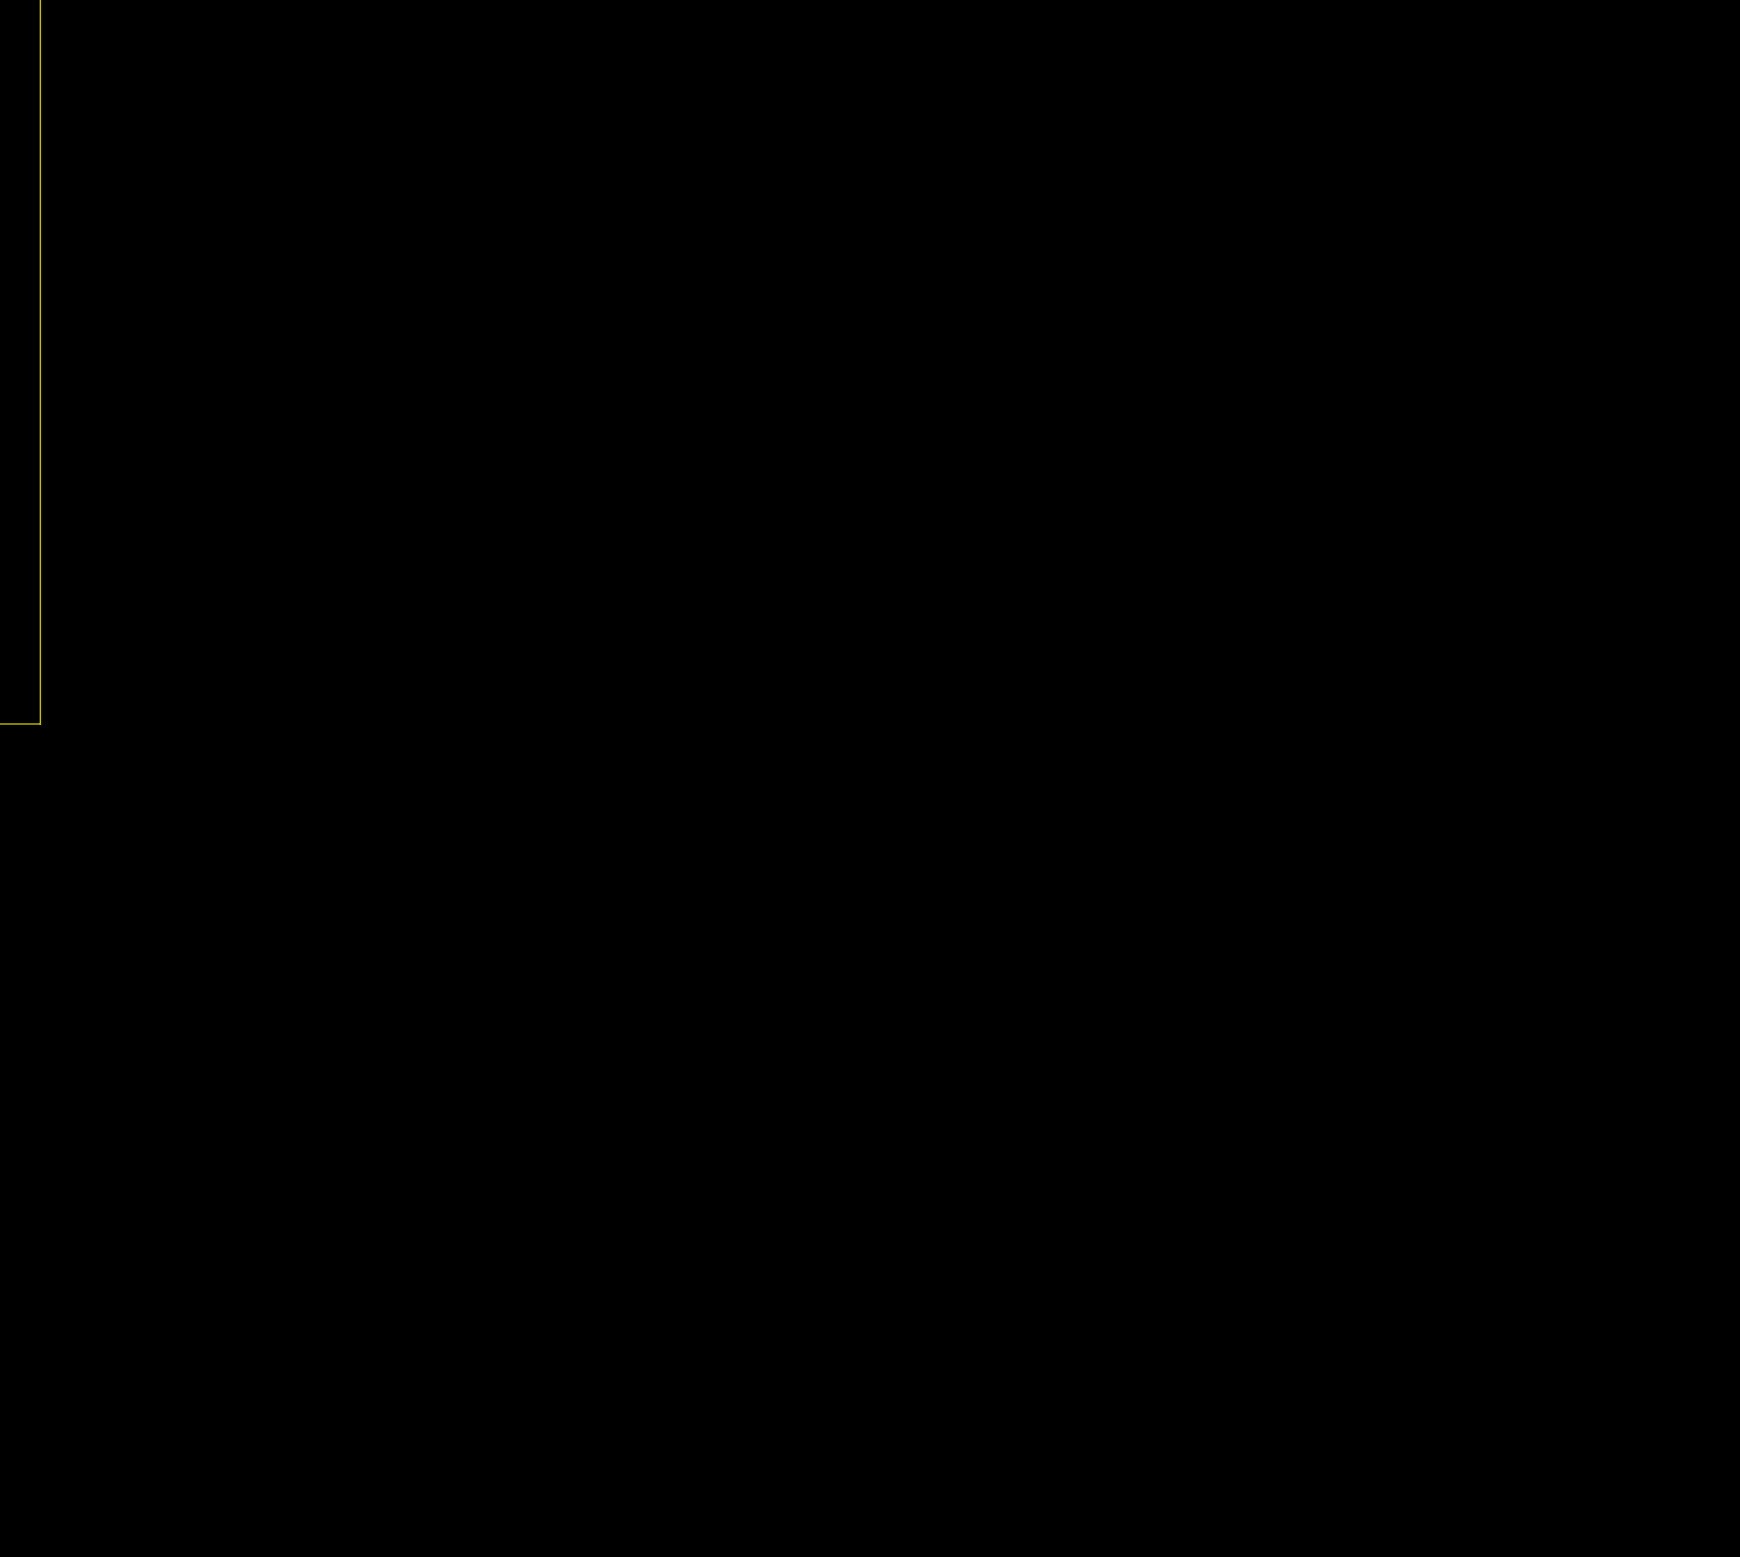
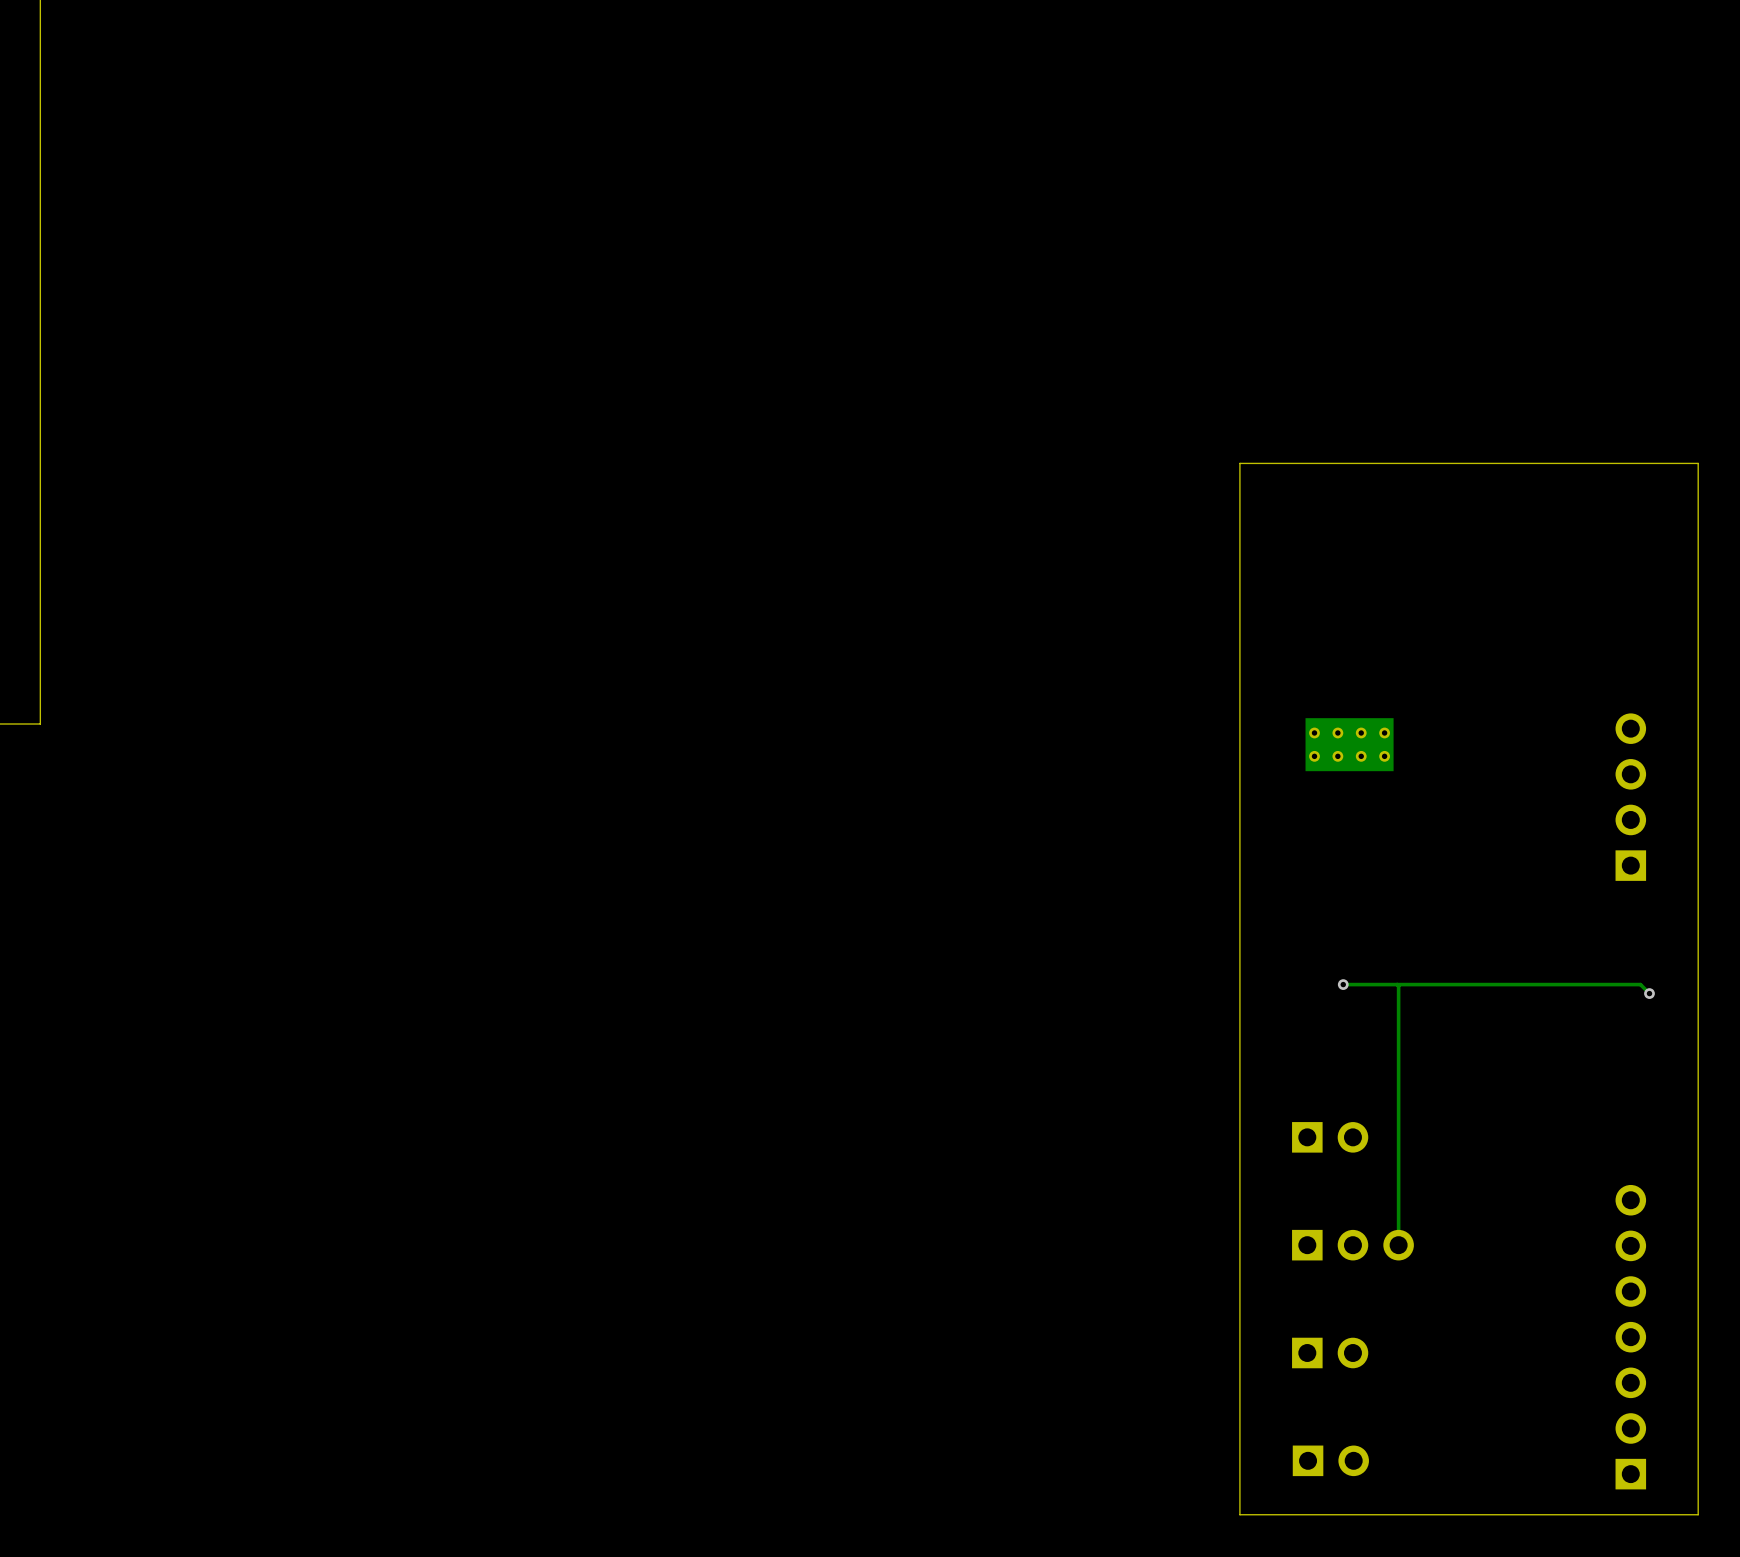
board edge: none -> (1698, 463) (1239, 463) (1239, 1514) (1698, 1514) (1698, 463)
part: none -> (1349, 744)
part: none -> (1630, 797)
track: none -> (1343, 984) (1640, 984) (1649, 993)
via: none -> (1343, 984)
track: none -> (1397, 984) (1398, 1245)
via: none -> (1649, 993)
part: none -> (1330, 1137)
part: none -> (1352, 1245)
part: none -> (1630, 1337)
part: none -> (1330, 1353)
part: none -> (1330, 1460)

